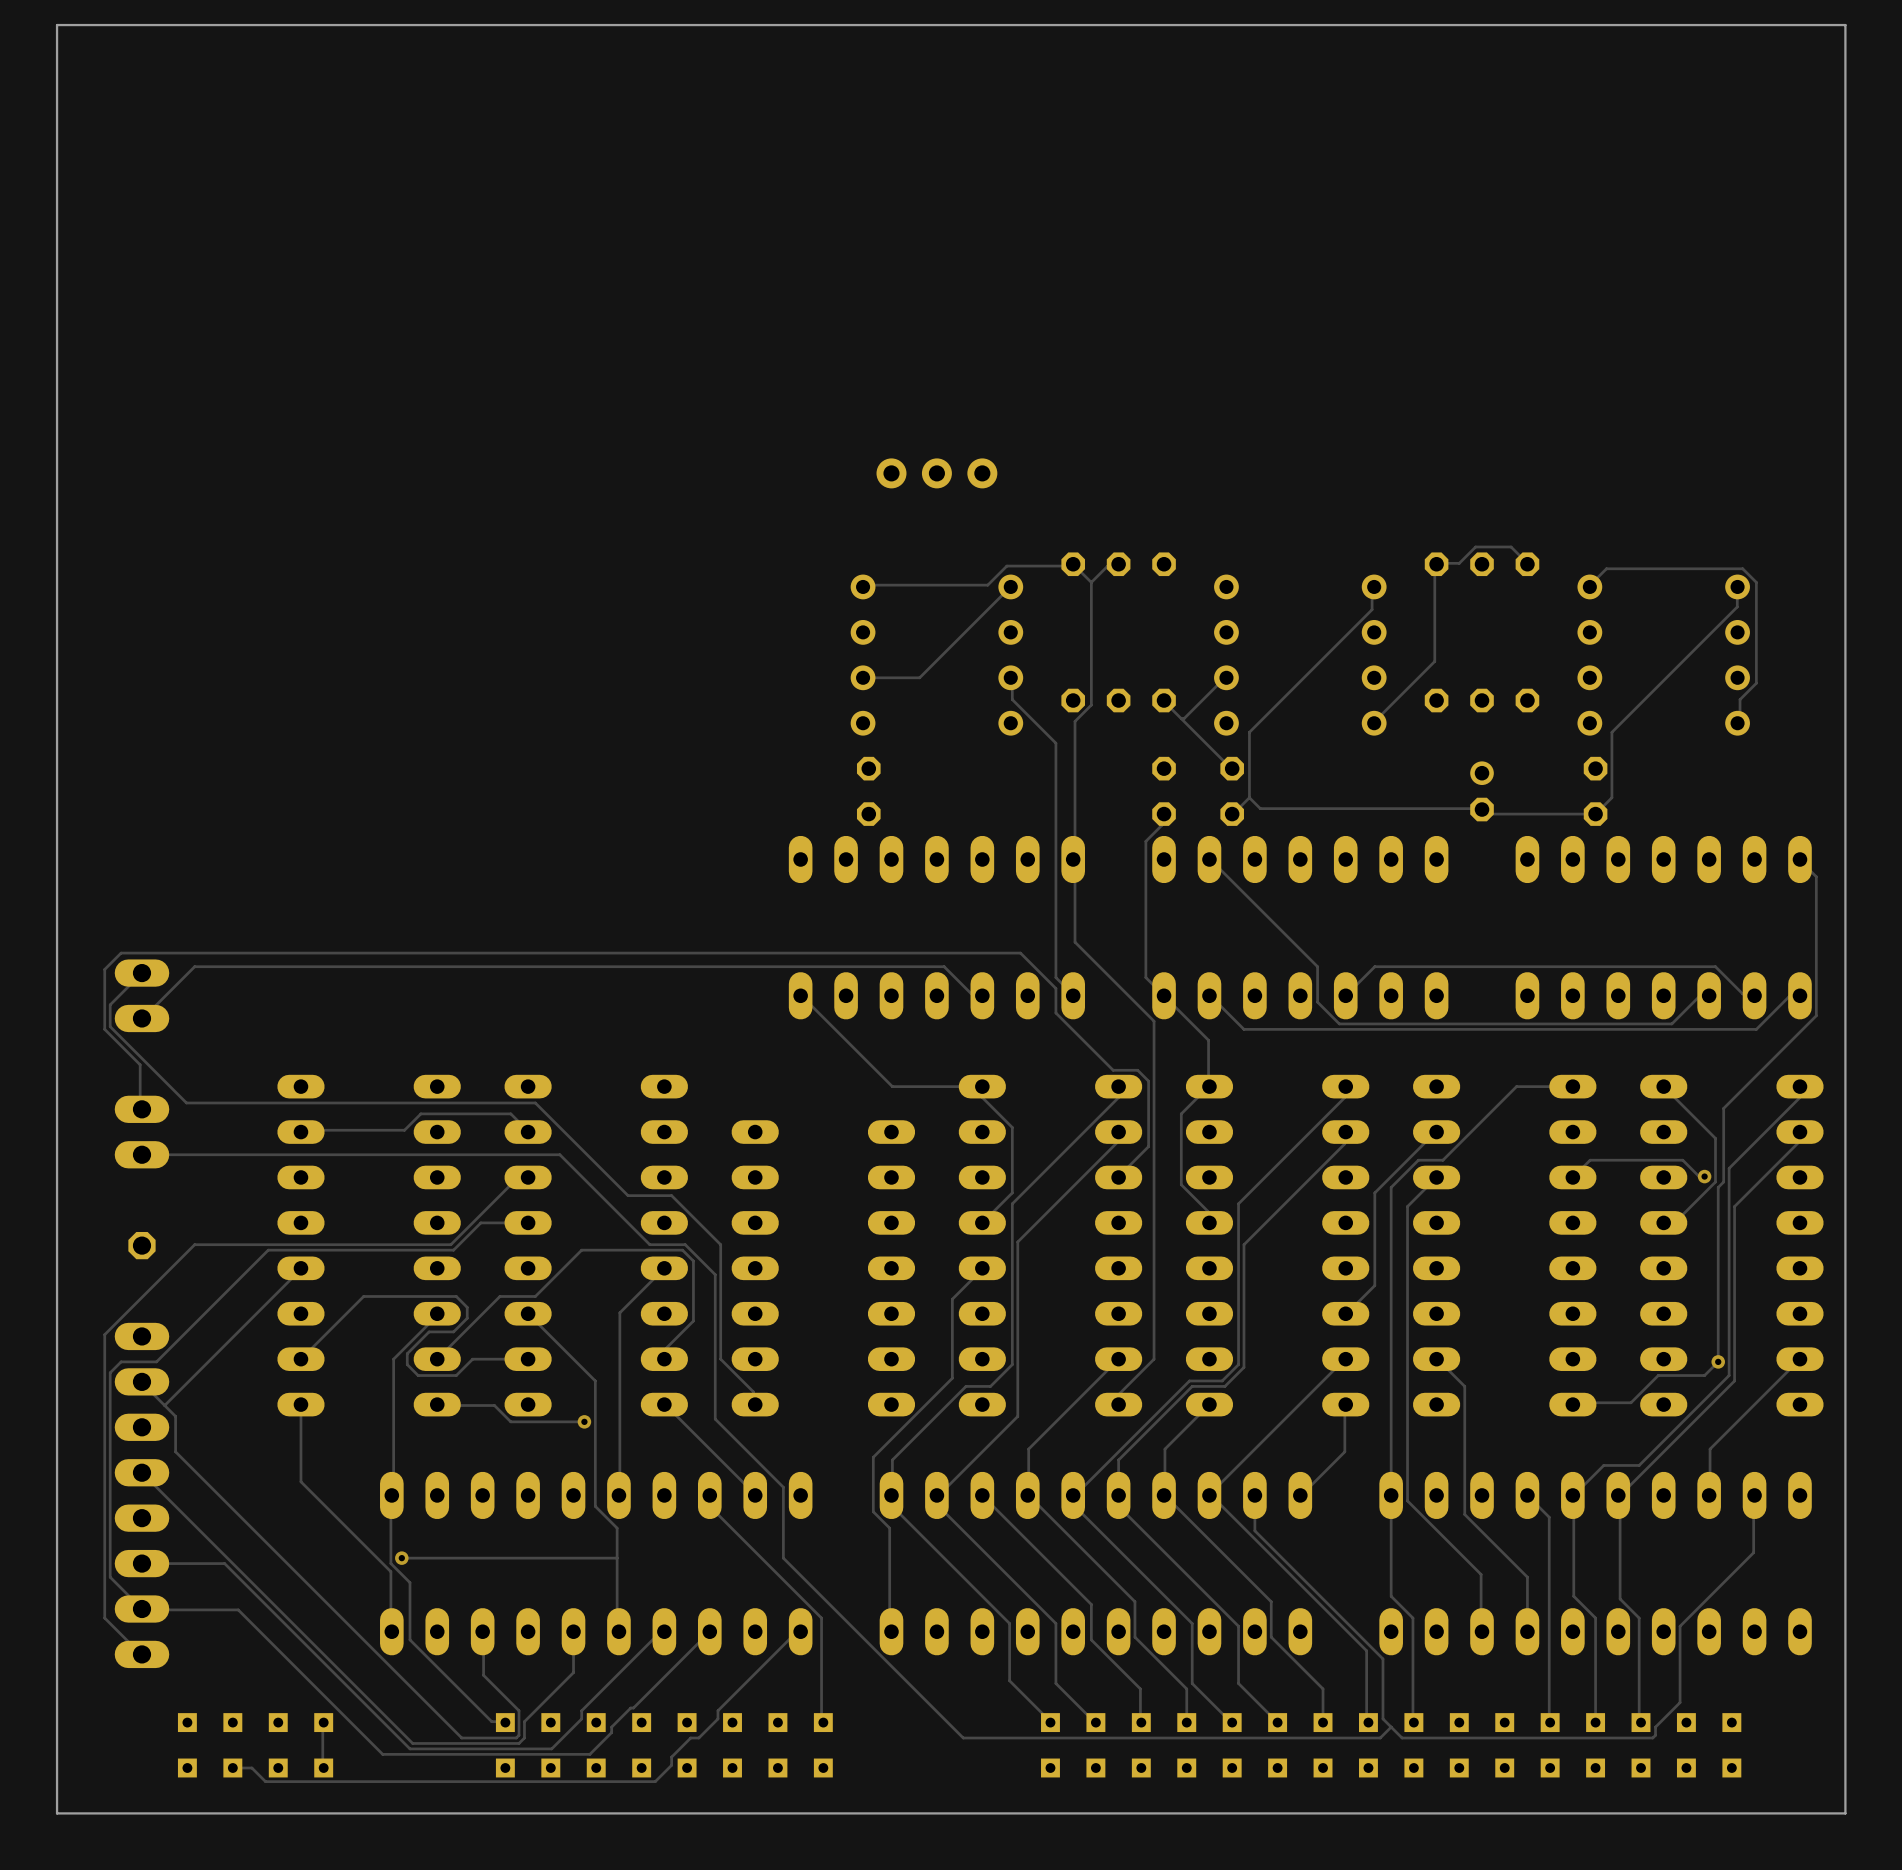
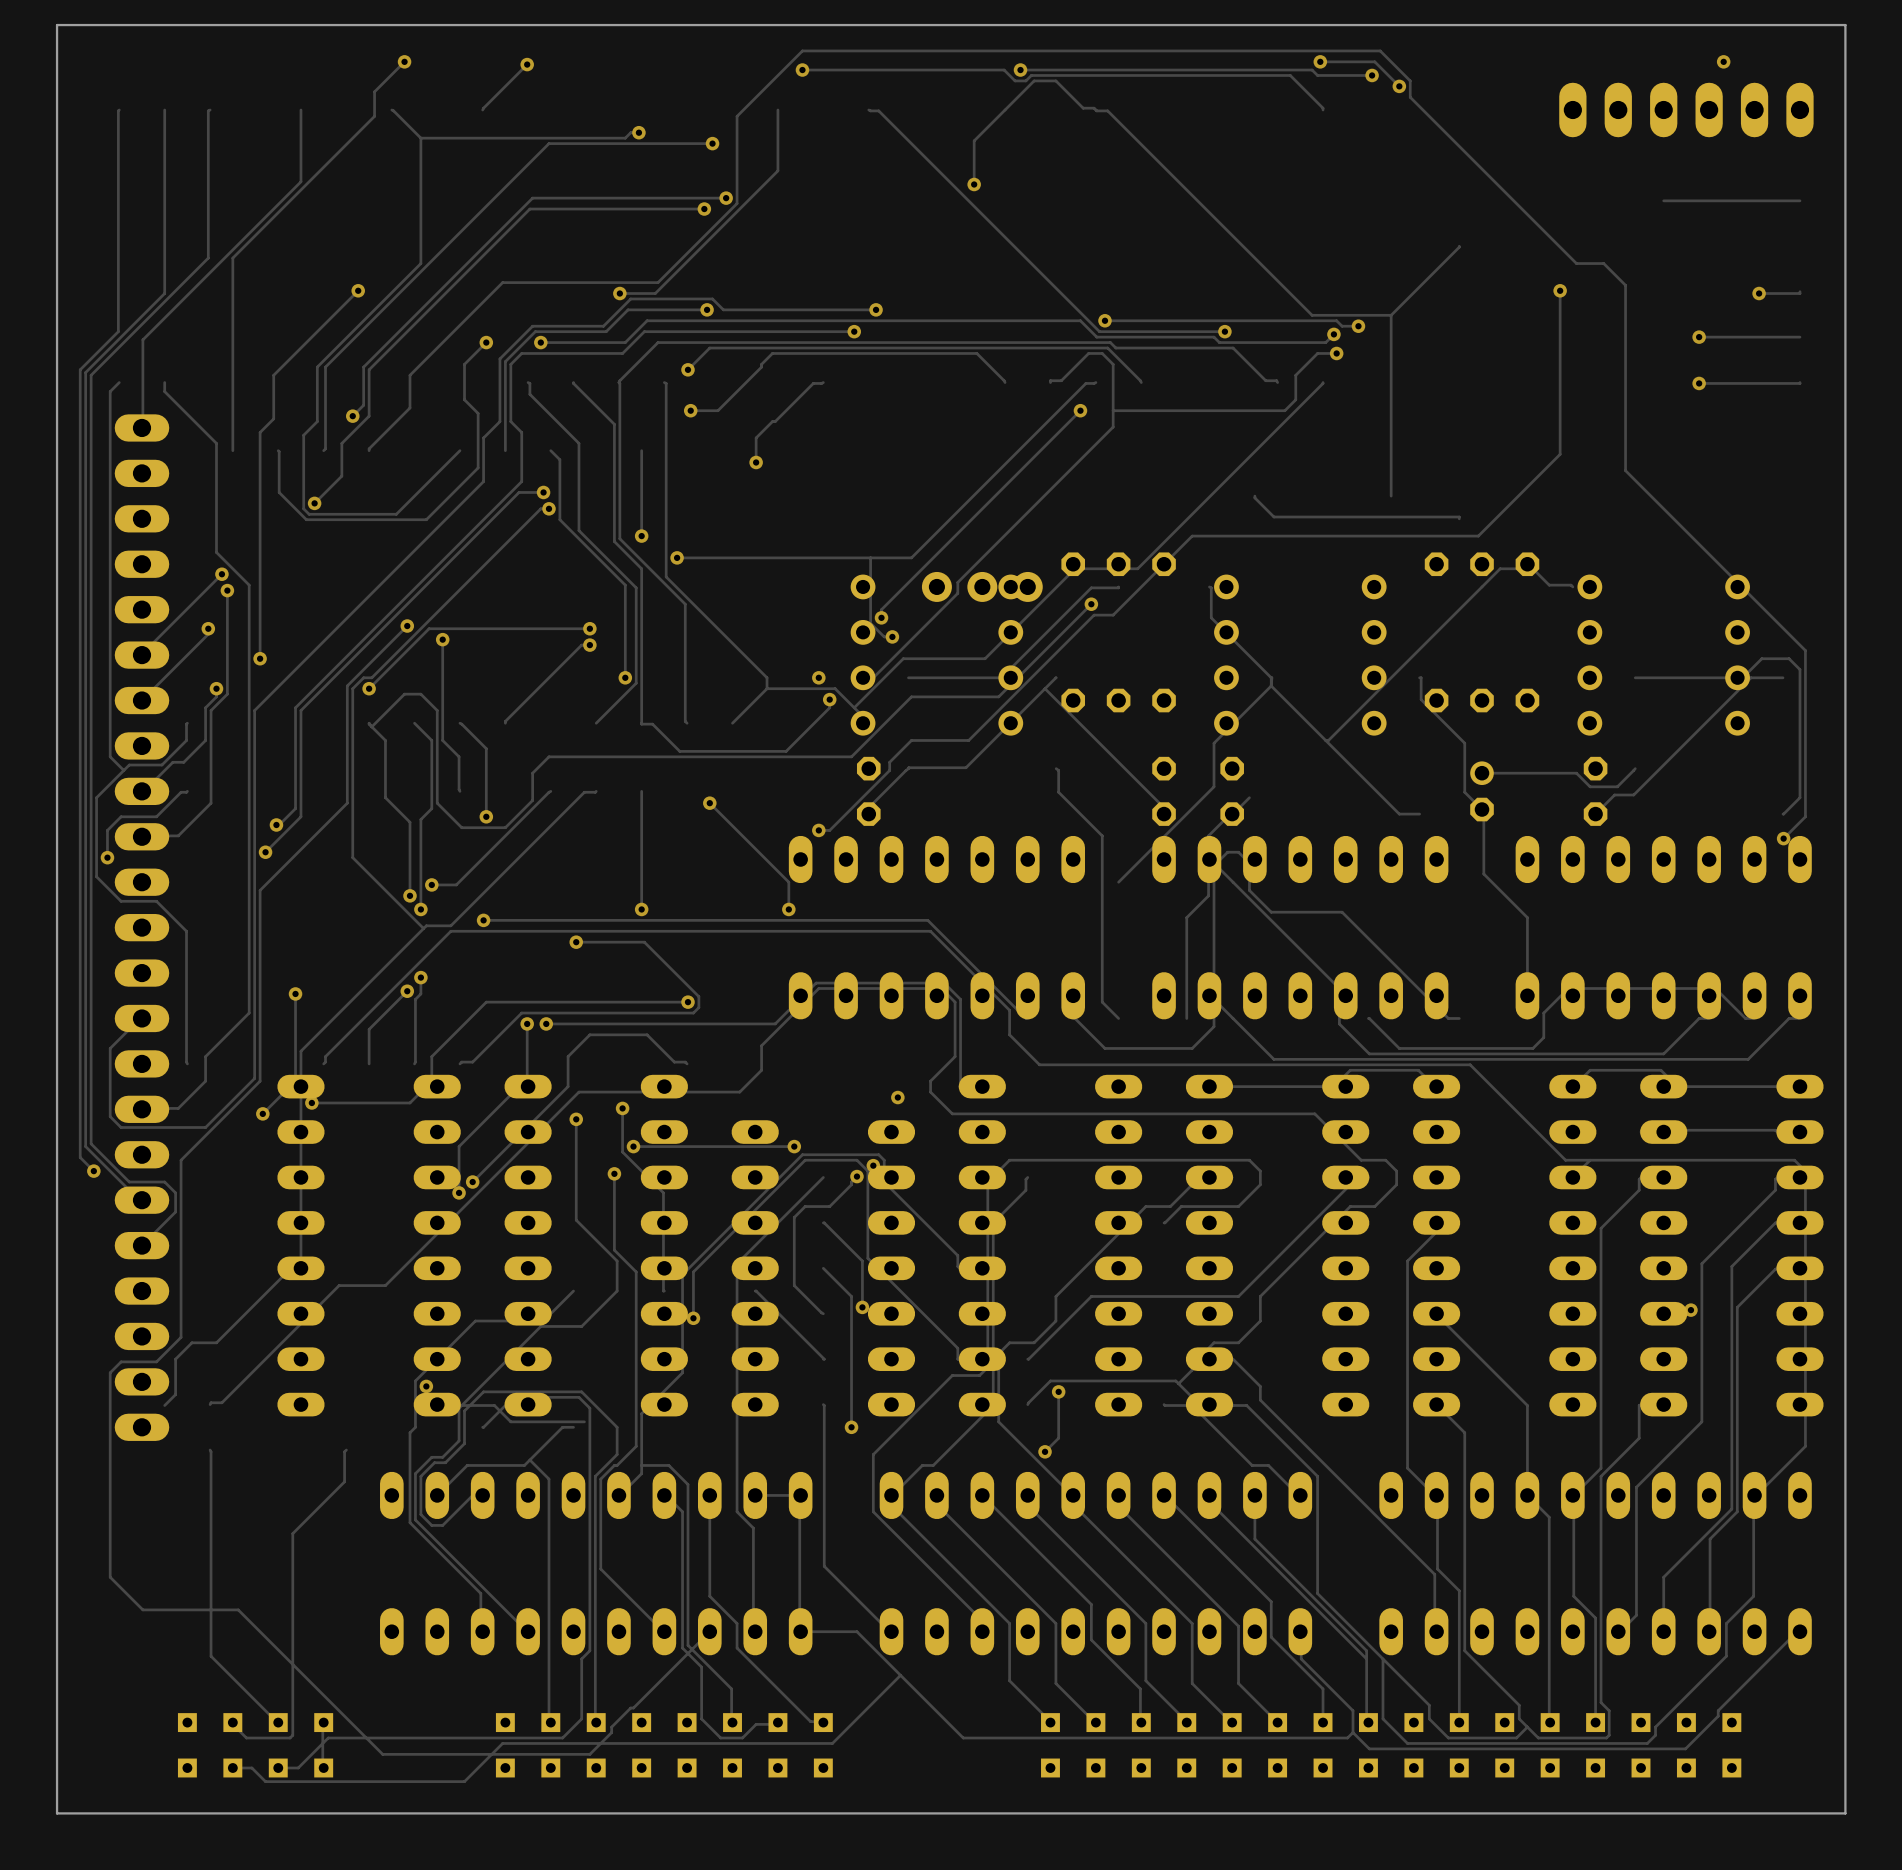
track: none -> (404, 61) (374, 91) (374, 116) (232, 258) (232, 450)
via: none -> (404, 61)
track: none -> (1320, 61) (1374, 61) (1399, 86)
via: none -> (1320, 61)
via: none -> (1723, 61)
track: none -> (527, 64) (482, 110)
via: none -> (527, 64)
track: none -> (802, 70) (1004, 70) (1015, 80) (1025, 80) (1031, 75) (1290, 75) (1323, 110)
via: none -> (802, 70)
track: none -> (1020, 70) (1312, 70) (1317, 75) (1372, 75)
via: none -> (1020, 70)
via: none -> (1372, 75)
via: none -> (1399, 86)
track: none -> (119, 110) (118, 331) (80, 369) (80, 1157) (93, 1171)
track: none -> (164, 110) (164, 293) (85, 372) (85, 1146) (140, 1201) (141, 1200)
track: none -> (210, 110) (208, 110) (208, 258) (91, 375) (91, 1143) (129, 1182) (164, 1182) (175, 1192) (175, 1212) (141, 1245)
track: none -> (300, 110) (300, 181) (142, 339) (141, 427)
track: none -> (391, 110) (420, 138)
track: none -> (777, 110) (777, 170) (655, 293) (619, 293)
track: none -> (868, 110) (878, 110) (1099, 331) (1224, 331)
part: none -> (1686, 110)
track: none -> (638, 132) (630, 132) (625, 138) (420, 138)
via: none -> (638, 132)
track: none -> (420, 138) (420, 263) (317, 367) (317, 421) (303, 435) (303, 508) (309, 514) (396, 514) (459, 450)
track: none -> (712, 143) (548, 143) (325, 367) (325, 448) (323, 450)
via: none -> (712, 143)
track: none -> (974, 184) (974, 140) (1034, 80) (1055, 80) (1083, 108) (1107, 110) (1312, 315) (1391, 315)
via: none -> (974, 184)
track: none -> (726, 198) (532, 198) (363, 367) (363, 405) (352, 416)
via: none -> (726, 198)
track: none -> (1799, 200) (1663, 200)
track: none -> (704, 209) (529, 209) (369, 369) (369, 416) (341, 443) (341, 476) (314, 503)
via: none -> (704, 209)
track: none -> (1459, 246) (1391, 315)
track: none -> (358, 290) (273, 375) (273, 418) (260, 432) (260, 658)
via: none -> (358, 290)
track: none -> (1560, 290) (1560, 454) (1478, 536) (1192, 536) (1113, 615) (1094, 615) (968, 740) (911, 740) (889, 762) (889, 770) (829, 830) (818, 830)
via: none -> (1560, 290)
track: none -> (1799, 291) (1799, 293) (1759, 293)
via: none -> (619, 293)
via: none -> (1759, 293)
track: none -> (707, 309) (628, 309) (606, 331) (535, 331) (505, 361) (505, 450)
via: none -> (707, 309)
via: none -> (876, 309)
track: none -> (1391, 315) (1391, 496)
track: none -> (1104, 320) (1336, 320) (1342, 326) (1358, 326)
via: none -> (1104, 320)
via: none -> (1358, 326)
track: none -> (854, 331) (644, 331) (622, 353) (521, 353) (510, 364) (510, 421) (521, 432) (521, 481) (295, 707) (295, 808) (279, 824) (276, 824)
via: none -> (854, 331)
via: none -> (1224, 331)
track: none -> (1333, 334) (1325, 342) (1219, 342) (1214, 337) (1096, 337) (1080, 320) (647, 320) (625, 342) (540, 342)
via: none -> (1333, 334)
via: none -> (1699, 337)
track: none -> (1799, 337) (1699, 337)
track: none -> (486, 342) (464, 364) (464, 399) (478, 413) (478, 467) (426, 519) (306, 519) (279, 492) (278, 450)
via: none -> (486, 342)
via: none -> (540, 342)
track: none -> (1336, 353) (1317, 353) (1295, 375) (1295, 399) (1284, 410) (1113, 410)
via: none -> (1336, 353)
track: none -> (687, 369) (709, 348) (1107, 348) (1141, 382)
via: none -> (687, 369)
track: none -> (119, 382) (110, 391) (110, 756) (123, 770)
track: none -> (528, 382) (529, 383) (529, 394) (578, 443) (578, 530) (636, 587) (636, 683) (596, 723)
track: none -> (573, 382) (614, 424) (614, 541) (641, 568) (641, 724) (652, 724) (679, 751) (786, 751) (829, 707) (829, 699)
track: none -> (664, 382) (666, 383) (666, 576) (767, 677) (767, 688)
track: none -> (823, 382) (813, 383) (756, 437) (756, 462)
track: none -> (1005, 382) (976, 353) (772, 353) (761, 364) (761, 367) (717, 410) (690, 410)
track: none -> (1095, 382) (1085, 383) (911, 557) (677, 557)
track: none -> (1277, 382) (1276, 380) (1265, 380) (1233, 348) (1115, 348) (1110, 342) (658, 342) (618, 382) (619, 538) (685, 604) (685, 721) (687, 723)
track: none -> (1323, 382) (1137, 568) (1075, 568) (985, 658) (903, 658) (854, 707)
track: none -> (1799, 382) (1699, 383)
via: none -> (1699, 383)
via: none -> (690, 410)
track: none -> (1080, 410) (881, 609) (881, 617)
via: none -> (1080, 410)
via: none -> (352, 416)
track: none -> (369, 450) (409, 407) (409, 375) (502, 282) (658, 282) (737, 203) (737, 116) (802, 50) (1380, 50) (1410, 80) (1410, 97) (1576, 263) (1603, 263) (1625, 285) (1625, 470) (1805, 650) (1805, 816) (1783, 838)
track: none -> (550, 450) (559, 459) (559, 519) (625, 585) (625, 677)
track: none -> (641, 450) (641, 536)
via: none -> (756, 462)
part position: (936, 473) -> (982, 586)
track: none -> (543, 492) (519, 492) (300, 710) (300, 816) (265, 852)
via: none -> (543, 492)
track: none -> (1254, 496) (1273, 517) (1459, 517) (1459, 518)
via: none -> (314, 503)
track: none -> (548, 508) (540, 508) (371, 677) (363, 677) (352, 688) (352, 857) (423, 928)
via: none -> (548, 508)
via: none -> (641, 536)
via: none -> (677, 557)
track: none -> (870, 557) (870, 623) (884, 636) (892, 636)
track: (1118, 564) (1118, 566) (1107, 566) (1091, 582) -> none
track: (1527, 564) (1511, 546) (1475, 546) (1459, 563) (1437, 563) (1434, 566) (1434, 661) (1374, 723) -> none
track: none -> (221, 574) (141, 655)
via: none -> (221, 574)
track: (1091, 582) (1091, 705) (1075, 721) (1075, 857) (1073, 859) (1075, 860) (1075, 942) (1154, 1021) (1154, 1359) (1118, 1394) (1118, 1404) -> none
track: (1091, 582) (1073, 564) (1072, 566) (1006, 566) (987, 585) (865, 585) (863, 586) -> none
track: (1010, 586) (919, 677) -> (1118, 586) (1091, 587) (1001, 677) (919, 677)
track: none -> (1209, 586) (1211, 587) (1211, 617) (1271, 677)
track: (1374, 586) (1372, 587) (1372, 609) (1249, 732) (1249, 797) (1260, 808) (1481, 808) -> (1419, 677) (1421, 677) (1421, 699) (1464, 743) (1464, 792) (1481, 808)
track: none -> (1572, 586) (1571, 585) (1549, 585) (1532, 568) (1500, 568) (1328, 740) (1325, 740)
track: (1589, 586) (1606, 568) (1742, 568) (1756, 582) (1756, 683) (1740, 699) (1740, 721) (1737, 723) -> none
track: (1737, 586) (1737, 606) (1611, 732) (1611, 797) -> (1783, 677) (1750, 677) (1633, 795) (1614, 795) (1611, 797)
track: none -> (227, 590) (227, 694) (211, 710) (211, 803) (178, 835) (141, 836)
via: none -> (227, 590)
track: none -> (1091, 604) (998, 696) (911, 696) (851, 756) (548, 756) (532, 773) (532, 800) (505, 827) (461, 827) (437, 803) (437, 710) (420, 694) (404, 694) (371, 726) (369, 723) (369, 724) (385, 740) (385, 797) (409, 822) (409, 895)
via: none -> (1091, 604)
via: none -> (881, 617)
via: none -> (407, 626)
track: none -> (208, 628) (208, 634) (141, 700)
via: none -> (208, 628)
track: none -> (589, 628) (429, 628) (369, 688)
via: none -> (589, 628)
via: none -> (892, 636)
track: none -> (442, 639) (442, 740) (459, 756) (459, 791)
via: none -> (442, 639)
track: none -> (589, 645) (581, 645) (505, 723)
via: none -> (589, 645)
via: none -> (260, 658)
via: none -> (625, 677)
via: none -> (818, 677)
track: (908, 677) (873, 677) -> (1050, 382) (1050, 380) (1061, 380) (1088, 353) (1102, 353) (1113, 364) (1113, 427) (957, 582) (957, 593) (873, 677)
track: (1010, 677) (1012, 677) (1012, 699) (1055, 743) (1055, 977) (1073, 995) -> none
track: none -> (1055, 677) (965, 767) (908, 767) (870, 805) (870, 814) (868, 814)
track: (1226, 677) (1184, 718) (1181, 718) -> none
track: none -> (1635, 677) (1742, 677) (1761, 658) (1789, 658) (1799, 669) (1799, 797) (1783, 814)
track: none -> (1271, 685) (1214, 743) (1214, 786) (1118, 882)
track: none -> (1271, 685) (1399, 814) (1419, 814)
track: none -> (216, 688) (216, 696) (205, 707) (205, 740) (183, 762) (172, 762) (141, 791)
via: none -> (216, 688)
via: none -> (369, 688)
track: none -> (767, 688) (835, 688) (867, 721)
track: none -> (767, 688) (732, 723)
via: none -> (829, 699)
track: (1164, 700) (1232, 768) -> none
track: none -> (187, 723) (186, 740) (161, 765) (129, 765) (96, 797) (96, 876) (121, 901) (156, 901) (186, 931) (187, 1063)
track: none -> (414, 723) (431, 740) (431, 808) (420, 819) (420, 909)
track: none -> (459, 723) (486, 748) (486, 816)
part: none -> (141, 745)
track: none -> (1056, 768) (1058, 770) (1058, 792) (1102, 835) (1102, 1002) (1118, 1018)
track: none -> (1635, 768) (1617, 786) (1590, 786) (1576, 773) (1482, 773)
track: none -> (187, 791) (181, 792) (156, 816) (121, 816) (107, 830) (107, 857)
track: none -> (550, 791) (456, 884) (431, 884)
track: none -> (641, 791) (641, 909)
track: none -> (709, 803) (788, 882) (788, 909)
via: none -> (709, 803)
track: (1483, 811) (1486, 814) (1595, 814) -> (1483, 811) (1483, 874) (1527, 917) (1527, 1018)
track: (1162, 814) (1162, 824) (1145, 841) (1145, 977) (1208, 1040) (1208, 1086) (1181, 1113) (1181, 1184) (1208, 1212) (1209, 1222) -> (1162, 814) (1162, 805) (1045, 688)
track: none -> (1232, 814) (1208, 835) (1208, 895) (1186, 917) (1186, 1018)
via: none -> (486, 816)
via: none -> (276, 824)
via: none -> (818, 830)
via: none -> (1783, 838)
via: none -> (265, 852)
via: none -> (107, 857)
track: (1799, 859) (1816, 876) (1816, 1015) (1723, 1108) (1723, 1182) (1718, 1187) (1718, 1361) (1704, 1375) (1658, 1375) (1631, 1402) (1573, 1402) (1572, 1404) -> none
via: none -> (431, 884)
via: none -> (409, 895)
via: none -> (420, 909)
via: none -> (641, 909)
via: none -> (788, 909)
track: none -> (483, 920) (927, 920) (1027, 1018)
via: none -> (483, 920)
track: none -> (576, 942) (644, 942) (698, 996) (698, 1007) (693, 1013) (521, 1013) (472, 1062) (461, 1062) (459, 1063)
via: none -> (576, 942)
track: (1317, 966) (1317, 1002) (1339, 1023) (1671, 1023) (1699, 996) (1709, 995) -> (1317, 966) (1339, 988) (1339, 1023) (1369, 1053) (1663, 1053) (1699, 1018) (1709, 1018)
track: (141, 973) (110, 1004) (110, 1026) (186, 1102) (311, 1102) -> none
track: none -> (420, 977) (420, 993) (415, 999) (414, 1063)
via: none -> (420, 977)
track: none -> (407, 991) (369, 1029) (369, 1063)
via: none -> (407, 991)
track: none -> (295, 993) (295, 1081) (262, 1113)
via: none -> (295, 993)
part: (141, 995) -> none
track: (800, 995) (892, 1086) (959, 1086) -> none
track: (982, 995) (982, 993) (971, 993) (944, 966) (194, 966) (141, 1018) -> (876, 309) (723, 309) (712, 298) (630, 298) (603, 326) (532, 326) (499, 358) (499, 421) (483, 437) (483, 481) (254, 710) (254, 1078) (205, 1127) (121, 1127) (110, 1116) (110, 1048) (141, 1018)
track: (1754, 995) (1753, 993) (1742, 993) (1715, 966) (1374, 966) (1345, 995) -> none
track: (1799, 995) (1789, 996) (1756, 1029) (1243, 1029) -> (1799, 1018) (1789, 1018) (1748, 1059) (1273, 1059) (1243, 1029)
via: none -> (687, 1002)
track: none -> (1459, 1018) (1448, 1018) (1342, 912) (1271, 912) (1249, 890) (1249, 863) (1238, 852) (1227, 852) (1214, 865) (1214, 1026) (1192, 1048) (1104, 1048) (1073, 1018)
track: none -> (1754, 1018) (1745, 1018) (1715, 988) (1568, 988) (1543, 1013) (1543, 1037) (1532, 1048) (1399, 1048) (1368, 1018)
track: none -> (527, 1023) (527, 1078) (459, 1146) (459, 1192)
via: none -> (527, 1023)
via: none -> (546, 1023)
track: none -> (323, 1063) (325, 1056) (450, 931) (930, 931) (1009, 1010) (1009, 1034) (1039, 1064) (1470, 1064) (1565, 1160) (1590, 1160)
track: none -> (687, 1063) (685, 1062) (674, 1062) (647, 1034) (589, 1034) (568, 1056) (568, 1086) (472, 1182)
track: (960, 1086) (982, 1086) (982, 1097) (1012, 1127) (1012, 1192) (982, 1222) -> (960, 1086) (960, 999) (944, 983) (816, 983) (775, 1023) (546, 1023)
track: (1118, 1086) (1118, 1097) (1025, 1190) -> (1027, 1177) (1025, 1179) (1025, 1190)
track: (1345, 1086) (1344, 1097) (1238, 1203) (1238, 1364) (1222, 1380) (1189, 1380) (1075, 1495) -> none
track: none -> (1436, 1086) (1418, 1070) (1350, 1070) (1333, 1086) (1232, 1086)
track: (1572, 1086) (1516, 1086) (1442, 1160) (1418, 1160) (1391, 1187) (1391, 1596) (1412, 1618) (1413, 1722) -> (1572, 1086) (1590, 1070) (1660, 1070) (1677, 1086) (1777, 1086)
track: (1663, 1086) (1715, 1138) (1715, 1182) (1674, 1222) (1663, 1222) -> none
track: (1799, 1086) (1799, 1097) (1729, 1168) (1729, 1375) (1639, 1465) (1603, 1465) (1601, 1468) -> (1641, 1177) (1639, 1179) (1639, 1190) (1601, 1228) (1601, 1468)
via: none -> (897, 1097)
via: none -> (311, 1102)
track: (409, 1102) (535, 1102) (628, 1195) (671, 1195) (720, 1244) (720, 1359) (753, 1391) (753, 1402) (755, 1404) -> (409, 1102) (431, 1081) (431, 1056) (486, 1002) (687, 1002)
track: none -> (622, 1108) (622, 1152) (663, 1192) (664, 1291)
via: none -> (622, 1108)
track: (141, 1109) (140, 1108) (140, 1064) (104, 1029) (104, 969) (121, 953) (1020, 953) (1055, 988) (1055, 1013) (1113, 1070) (1137, 1070) (1148, 1081) (1148, 1146) (1118, 1177) -> (141, 1109) (178, 1108) (205, 1081) (205, 1056) (249, 1013) (249, 585) (216, 552) (216, 443) (164, 391) (164, 382)
via: none -> (262, 1113)
track: none -> (576, 1119) (576, 1220) (617, 1261) (617, 1291) (581, 1326) (540, 1326) (459, 1408) (459, 1440) (442, 1457) (431, 1457) (415, 1473) (415, 1519) (528, 1631)
via: none -> (576, 1119)
track: (300, 1130) (404, 1130) (420, 1113) (510, 1113) (528, 1132) -> (300, 1130) (300, 1051) (426, 925) (450, 925) (584, 792) (596, 791)
part: (141, 1132) -> none
track: (1118, 1132) (1118, 1141) (1017, 1241) (1017, 1416) (938, 1495) -> none
track: (1345, 1132) (1344, 1143) (1243, 1244) (1243, 1367) (1224, 1386) (1192, 1386) (1118, 1460) (1118, 1495) -> none
track: (1436, 1132) (1374, 1192) (1374, 1285) (1345, 1313) -> none
track: none -> (1777, 1132) (1775, 1130) (1641, 1130) (1641, 1132)
track: (1799, 1132) (1799, 1141) (1734, 1206) (1734, 1380) (1620, 1495) -> none
via: none -> (633, 1146)
track: none -> (794, 1146) (633, 1146)
via: none -> (794, 1146)
track: (141, 1154) (559, 1154) (649, 1244) (685, 1244) (715, 1274) (715, 1419) (783, 1487) (783, 1558) (856, 1631) -> (800, 1631) (856, 1631)
track: (1682, 1160) (1699, 1176) (1704, 1176) -> (1682, 1160) (1794, 1160) (1805, 1171) (1805, 1446) (1754, 1495)
via: none -> (873, 1165)
via: none -> (93, 1171)
track: none -> (867, 1171) (867, 1258) (957, 1348) (957, 1359) (959, 1359)
track: none -> (867, 1171) (856, 1160) (805, 1160) (693, 1271)
track: none -> (614, 1173) (614, 1250) (636, 1271) (636, 1446) (600, 1479) (600, 1569) (663, 1631)
via: none -> (614, 1173)
track: none -> (856, 1176) (829, 1206) (805, 1206) (794, 1217) (794, 1285) (823, 1313)
via: none -> (856, 1176)
via: (1704, 1176) -> none
track: (528, 1177) (527, 1179) (516, 1179) (450, 1244) (194, 1244) (104, 1334) (104, 1618) (141, 1654) -> none
track: none -> (823, 1177) (737, 1263) (737, 1511) (753, 1528) (753, 1631) (755, 1631)
track: none -> (1232, 1177) (1230, 1179) (1197, 1179) (1170, 1206) (1145, 1206) (1055, 1296) (1055, 1321) (1034, 1342) (1009, 1342) (998, 1353) (998, 1421) (1073, 1495)
track: none -> (1368, 1177) (1366, 1179) (1355, 1179) (1238, 1296) (1091, 1296) (1027, 1359)
track: (1436, 1177) (1407, 1206) (1407, 1261) -> (1436, 1222) (1434, 1222) (1434, 1233) (1407, 1261)
track: none -> (1777, 1177) (1775, 1179) (1775, 1190) (1701, 1263) (1701, 1421) (1636, 1487) (1636, 1615) (1618, 1631)
via: none -> (472, 1182)
via: none -> (459, 1192)
track: (1012, 1203) (1012, 1364) (990, 1386) (965, 1386) (892, 1460) (892, 1495) -> (1012, 1203) (993, 1222) (993, 1405) (933, 1465) (922, 1465) (892, 1495)
track: (528, 1222) (480, 1222) (453, 1250) (268, 1250) (181, 1337) -> (407, 626) (347, 685) (347, 803) (260, 890) (260, 1081) (181, 1160) (181, 1337)
track: none -> (823, 1222) (862, 1261) (862, 1307)
track: none -> (1777, 1222) (1731, 1266) (1731, 1509) (1663, 1577) (1663, 1631)
part: (141, 1245) -> none
track: (300, 1268) (175, 1394) -> (300, 1132) (300, 1258) (216, 1342) (191, 1342) (175, 1359) (175, 1394)
track: (664, 1268) (619, 1312) (619, 1495) -> (959, 1268) (957, 1266) (957, 1255) (884, 1182) (884, 1160) (878, 1154) (802, 1154) (682, 1274) (682, 1372) (641, 1413) (641, 1473) (619, 1495)
track: none -> (823, 1268) (851, 1296) (851, 1427)
track: (982, 1268) (952, 1299) (952, 1378) (873, 1457) -> (1164, 1222) (1181, 1206) (1238, 1206) (1260, 1184) (1260, 1171) (1249, 1160) (1009, 1160) (987, 1182) (987, 1367) (979, 1375) (952, 1375) (873, 1454) (873, 1457)
track: none -> (1777, 1268) (1737, 1307) (1737, 1511) (1710, 1539) (1709, 1631)
track: (693, 1271) (693, 1261) (682, 1250) (581, 1250) (535, 1296) (499, 1296) (475, 1321) -> (573, 1291) (543, 1321) (475, 1321)
track: none -> (755, 1291) (823, 1359)
via: none -> (862, 1307)
track: (437, 1313) (393, 1359) (393, 1495) (390, 1495) (390, 1563) (409, 1582) (409, 1639) (491, 1721) (505, 1722) -> none
track: (528, 1313) (595, 1380) (595, 1476) -> (482, 1495) (472, 1495) (442, 1525) (431, 1525) (420, 1514) (420, 1476) (434, 1462) (445, 1462) (464, 1443) (464, 1410) (483, 1391) (581, 1391) (617, 1427) (617, 1454) (595, 1476)
track: none -> (1436, 1313) (1527, 1405) (1527, 1495)
track: (693, 1318) (693, 1321) (666, 1348) (666, 1359) (664, 1359) -> none
via: none -> (693, 1318)
track: none -> (437, 1359) (415, 1380) (415, 1427) (409, 1432) (409, 1522) (480, 1593) (480, 1631) (482, 1631)
track: (528, 1359) (472, 1359) (456, 1375) (418, 1375) (407, 1364) (407, 1353) (429, 1331) (453, 1331) (467, 1318) (467, 1307) (456, 1296) (363, 1296) (300, 1359) -> none
track: (1118, 1359) (1028, 1449) (1028, 1495) (1134, 1601) (1134, 1637) (1186, 1688) (1186, 1721) -> (1028, 1495) (1028, 1506) (1145, 1623) (1145, 1680) (1186, 1721)
track: none -> (1233, 1359) (1260, 1386) (1260, 1400) (1434, 1574) (1434, 1631) (1436, 1631)
track: (1345, 1359) (1209, 1495) -> none
track: (1436, 1359) (1464, 1386) (1464, 1432) -> (1436, 1404) (1464, 1432)
track: (1799, 1359) (1710, 1449) (1709, 1495) -> none
via position: (1718, 1361) -> (1690, 1310)
track: (141, 1381) (175, 1416) (175, 1451) (461, 1738) -> (278, 1767) (298, 1767) (328, 1738) (461, 1738)
track: none -> (1178, 1383) (1192, 1370) (1192, 1364) (1214, 1342) (1238, 1342) (1260, 1321) (1260, 1296) (1350, 1206) (1374, 1206) (1396, 1184) (1396, 1171) (1385, 1160) (1361, 1160) (1314, 1113) (952, 1113) (930, 1092) (930, 1081) (955, 1056) (955, 1002) (941, 988) (818, 988) (761, 1045) (761, 1070) (739, 1092) (578, 1092) (385, 1285) (339, 1285) (221, 1402) (211, 1402) (210, 1404)
via: none -> (426, 1386)
track: none -> (1058, 1391) (1058, 1438) (1045, 1451)
via: none -> (1058, 1391)
track: (300, 1404) (300, 1481) (390, 1571) (391, 1631) -> none
track: (664, 1404) (756, 1495) -> (800, 1495) (756, 1495)
track: none -> (823, 1404) (824, 1566) (889, 1631)
track: (1209, 1404) (1164, 1449) (1164, 1495) -> none
track: (1345, 1404) (1344, 1451) (1300, 1495) -> (1164, 1404) (1192, 1405) (1252, 1465) (1268, 1465) (1300, 1495)
track: none -> (1641, 1404) (1639, 1405) (1639, 1438) (1601, 1476) (1601, 1702) (1609, 1710) (1609, 1735) (1606, 1738)
via: (584, 1421) -> none
track: none -> (573, 1427) (562, 1427) (524, 1465) (467, 1465) (437, 1495)
via: none -> (851, 1427)
track: none -> (210, 1450) (211, 1656) (278, 1722)
track: none -> (346, 1450) (344, 1451) (344, 1481) (292, 1533) (292, 1735) (290, 1738) (246, 1738) (232, 1722)
via: none -> (1045, 1451)
track: none -> (529, 1460) (548, 1479) (548, 1721) (550, 1722)
track: none -> (641, 1465) (668, 1465) (687, 1484) (687, 1645) (731, 1688) (732, 1722)
track: (1407, 1468) (1407, 1500) (1481, 1574) (1482, 1631) -> (1407, 1468) (1434, 1495) (1437, 1495) (1437, 1569) (1459, 1590) (1459, 1722)
track: (141, 1472) (412, 1743) (502, 1743) -> none
part position: (141, 1495) -> (141, 1268)
track: none -> (664, 1495) (682, 1511) (682, 1648) (701, 1667) (701, 1718) (720, 1738) (742, 1738) (756, 1724) (777, 1724) (777, 1722)
track: none -> (799, 1495) (799, 1631)
track: (1211, 1495) (1254, 1539) -> (1254, 1530) (1254, 1539)
track: none -> (1211, 1495) (1211, 1503) (1366, 1658)
track: (1620, 1495) (1620, 1599) (1639, 1618) (1639, 1721) (1641, 1722) -> none
track: (595, 1506) (617, 1528) (617, 1631) (618, 1631) -> (595, 1506) (596, 1722)
track: (709, 1506) (821, 1618) (821, 1721) -> (709, 1506) (709, 1596) (737, 1623) (737, 1648) (810, 1721) (821, 1721)
track: (1464, 1514) (1527, 1577) (1527, 1631) -> (1464, 1514) (1464, 1650) (1519, 1705) (1519, 1718) (1538, 1738)
track: (889, 1528) (889, 1631) -> (889, 1528) (982, 1620) (982, 1631)
track: (1254, 1530) (1317, 1593) -> (1027, 1404) (1050, 1380) (1175, 1380) (1197, 1402) (1230, 1402) (1233, 1405) (1246, 1405) (1317, 1476) (1317, 1593)
track: (1753, 1552) (1680, 1626) (1680, 1702) -> (1753, 1552) (1753, 1596) (1726, 1623) (1726, 1656) (1680, 1702)
via: (401, 1558) -> none
track: (617, 1558) (401, 1558) -> none
track: (141, 1563) (224, 1563) (409, 1748) (551, 1748) (562, 1738) -> none
track: (482, 1631) (483, 1675) (519, 1710) (519, 1735) (516, 1738) -> (562, 1738) (516, 1738)
track: (573, 1631) (573, 1672) (524, 1721) (524, 1738) (519, 1743) -> (900, 1675) (832, 1743) (519, 1743)
track: (663, 1631) (660, 1631) (581, 1710) -> (482, 1427) (513, 1397) (578, 1397) (589, 1408) (589, 1650) (581, 1658) (581, 1710)
track: (799, 1631) (797, 1631) (717, 1710) (717, 1718) (698, 1738) (690, 1738) (671, 1757) (671, 1765) (655, 1781) (464, 1781) -> (502, 1743) (464, 1781)
track: none -> (1300, 1631) (1301, 1658) (1353, 1710) (1353, 1732)
track: none -> (1799, 1631) (1797, 1631) (1718, 1710) (1718, 1716) (1685, 1748) (1369, 1748) (1353, 1732)
track: (1391, 1727) (1380, 1738) (1347, 1738) -> (1353, 1732) (1347, 1738)
track: (1448, 1738) (1402, 1738) -> (1448, 1738) (1429, 1718) (1429, 1705) (1382, 1658)
track: (1538, 1738) (1516, 1738) -> (1527, 1727) (1516, 1738)
track: (1652, 1738) (1606, 1738) -> (1652, 1738) (1647, 1743) (1407, 1743) (1402, 1738)

